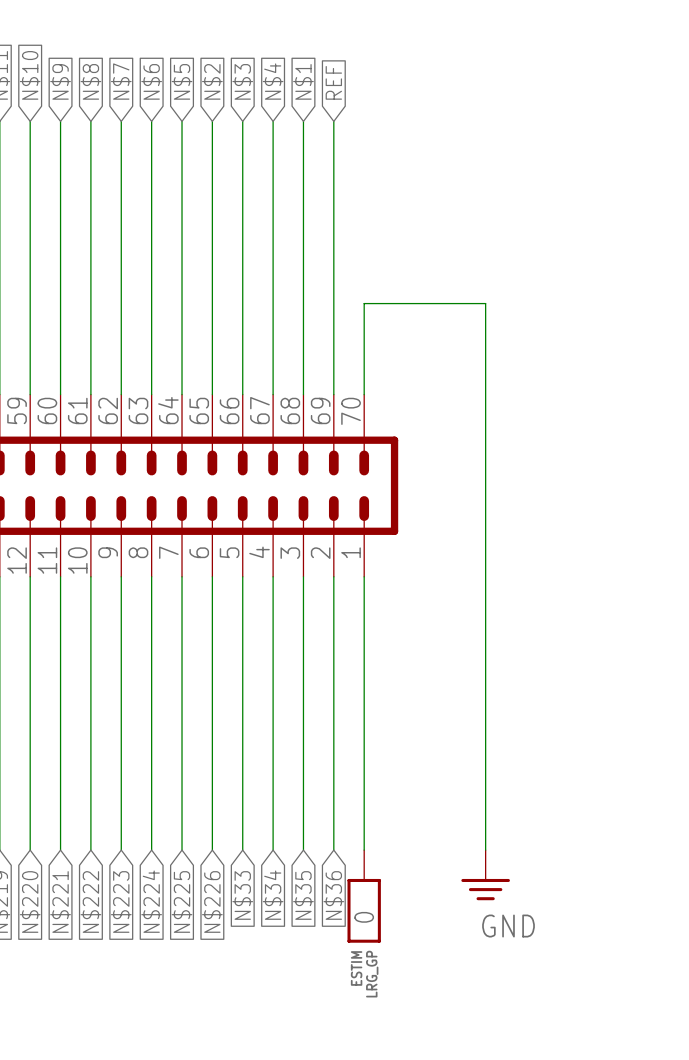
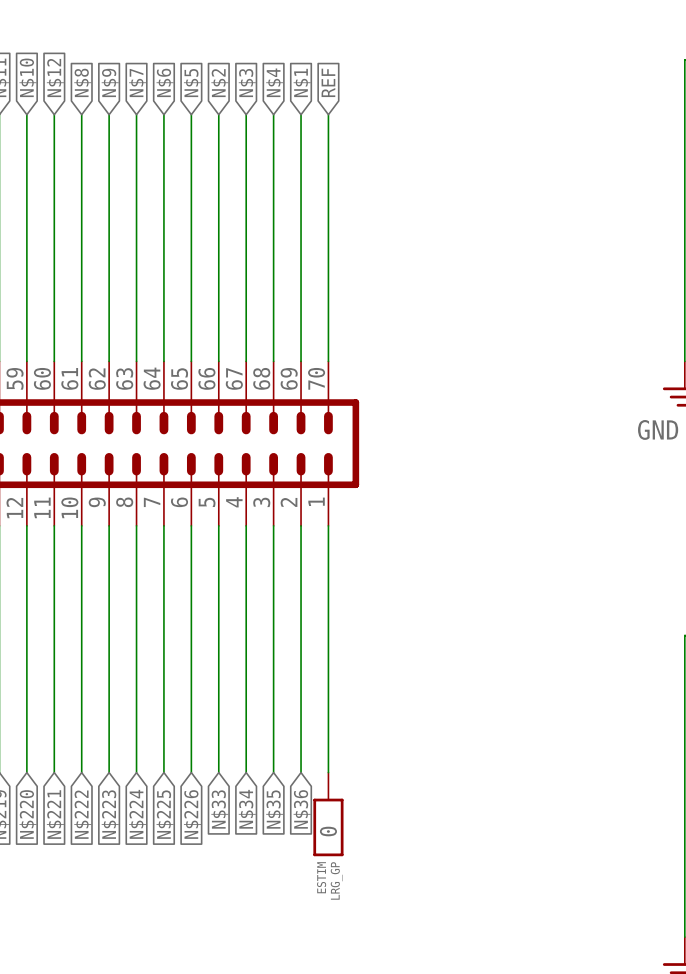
global label: N$9 (60, 81) -> N$12 (55, 78)
global label: N$7 (121, 81) -> N$9 (110, 82)
global label: N$6 (151, 81) -> N$7 (137, 83)
global label: N$5 (182, 81) -> N$6 (165, 82)
global label: N$2 (212, 81) -> N$5 (192, 83)
global label: N$3 (242, 81) -> N$2 (219, 83)
global label: N$4 (273, 81) -> N$3 (247, 83)
global label: N$1 (303, 81) -> N$4 (274, 82)
global label: REF (333, 82) -> N$1 (302, 82)
global label: none -> REF (328, 82)
wire: (364, 303) (485, 303) (485, 850) -> (328, 279) (328, 114)
power symbol: GND (485, 875) -> none

